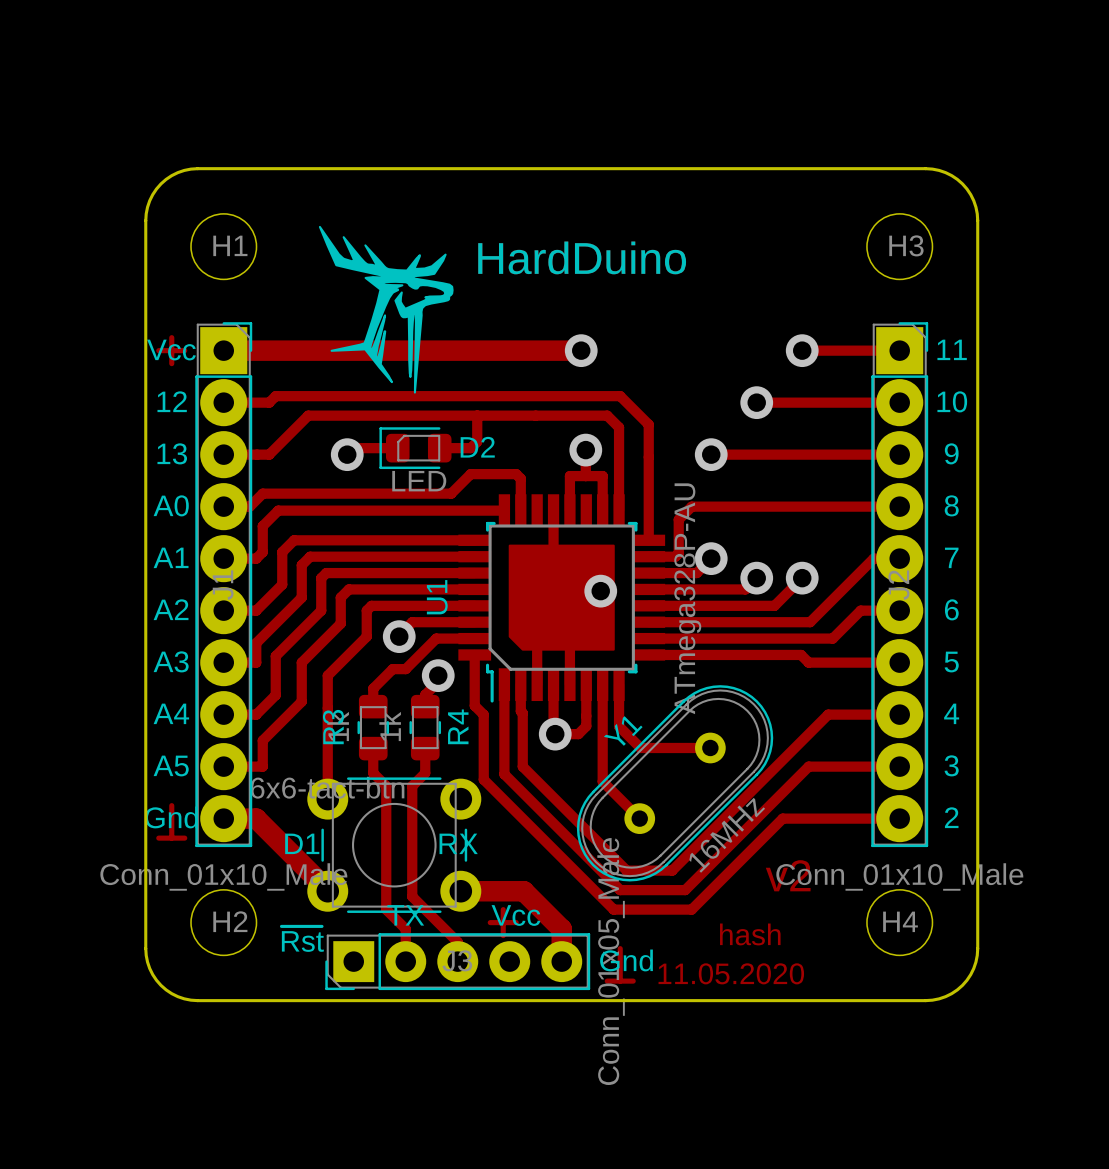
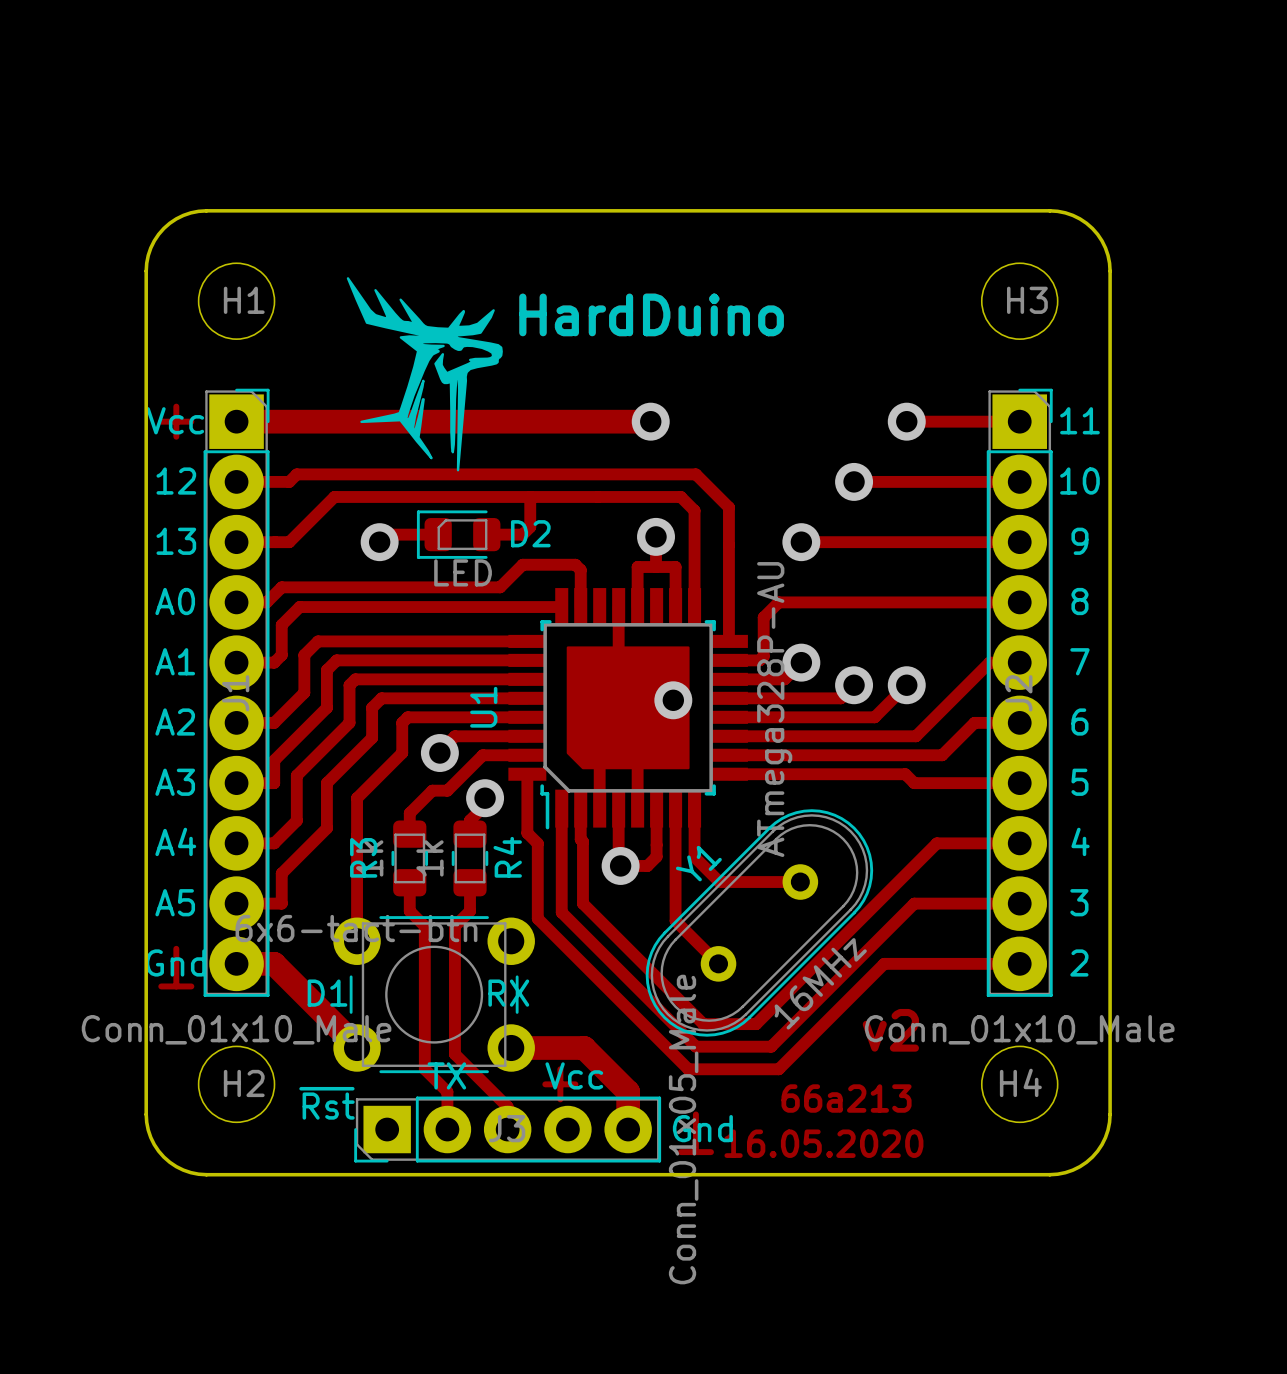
text: hash (750, 934) -> 66a213 (846, 1098)
text: 11.05.2020 (731, 973) -> 16.05.2020 (823, 1143)

